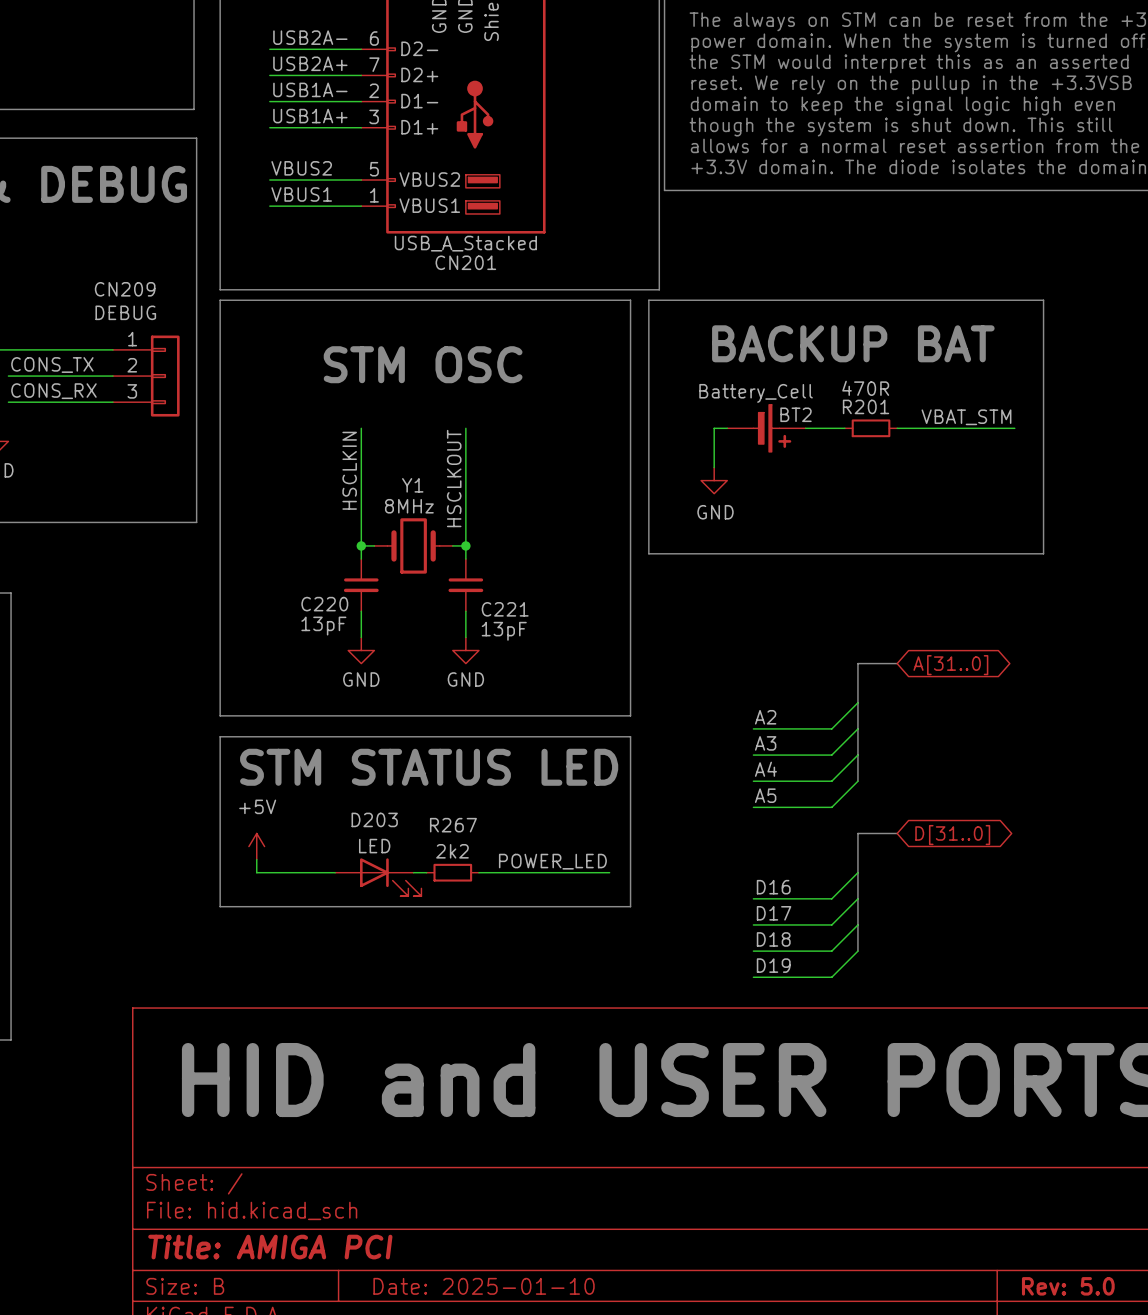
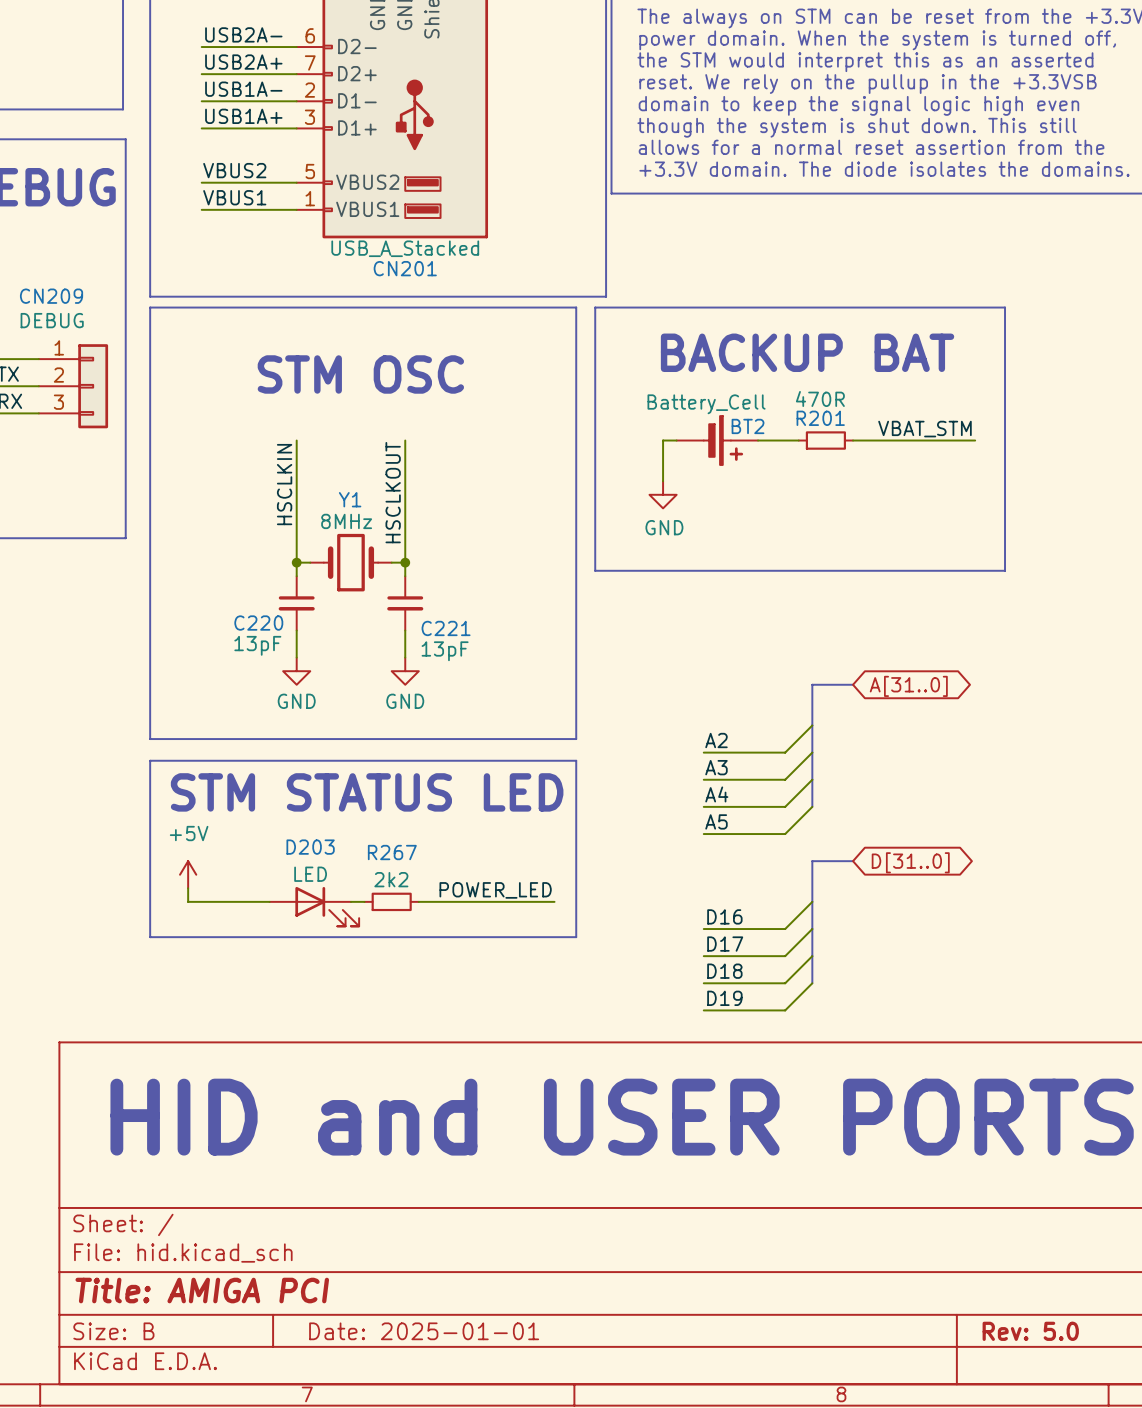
title block: Date: 2025-01-10 (484, 1286) -> Date: 2025-01-01 (424, 1331)

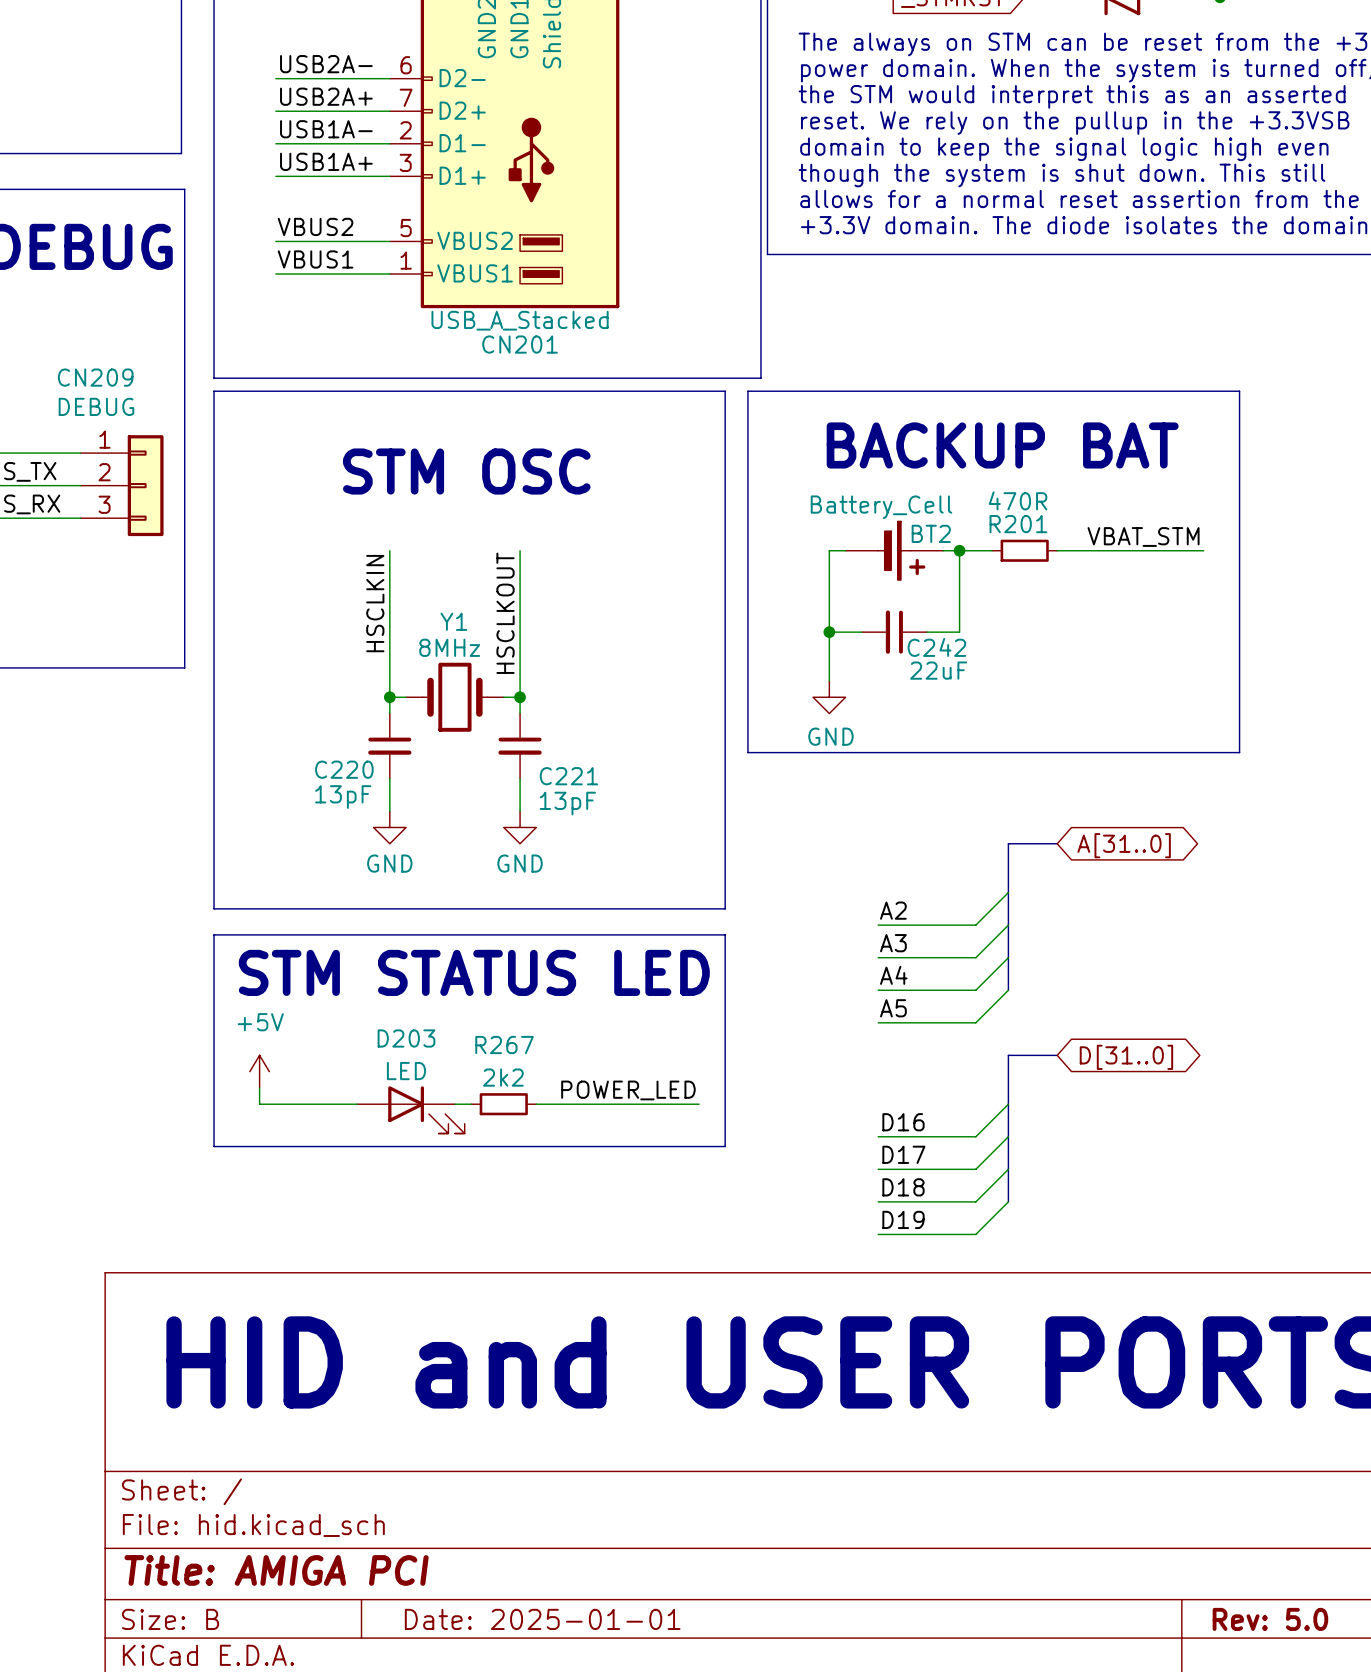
wire: none -> (959, 550) (959, 632) (927, 632)
junction: none -> (959, 550)
wire: none -> (829, 599) (829, 680)
power symbol position: GND (663, 494) -> GND (829, 697)
wire: none -> (829, 632) (861, 632)
junction: none -> (829, 632)
C242: none -> 22uF (894, 632)
line: (595, 570) (1005, 570) -> (747, 707) (747, 752) (1239, 752) (1239, 707)

